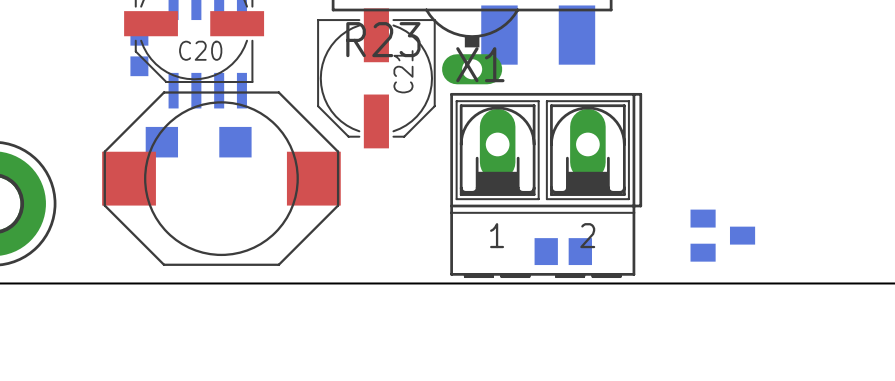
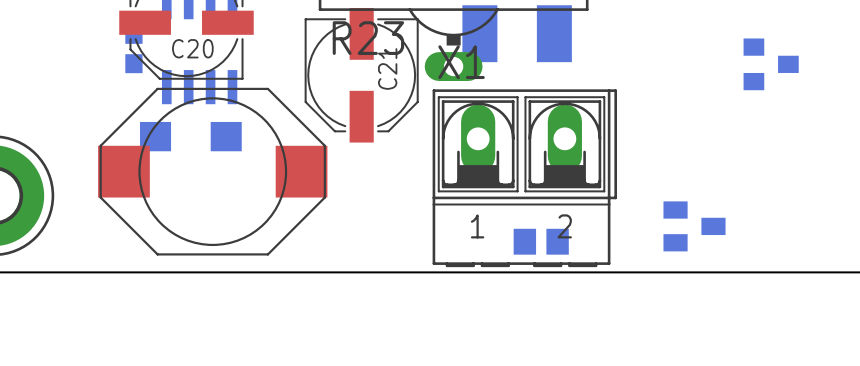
part: none -> (771, 64)

